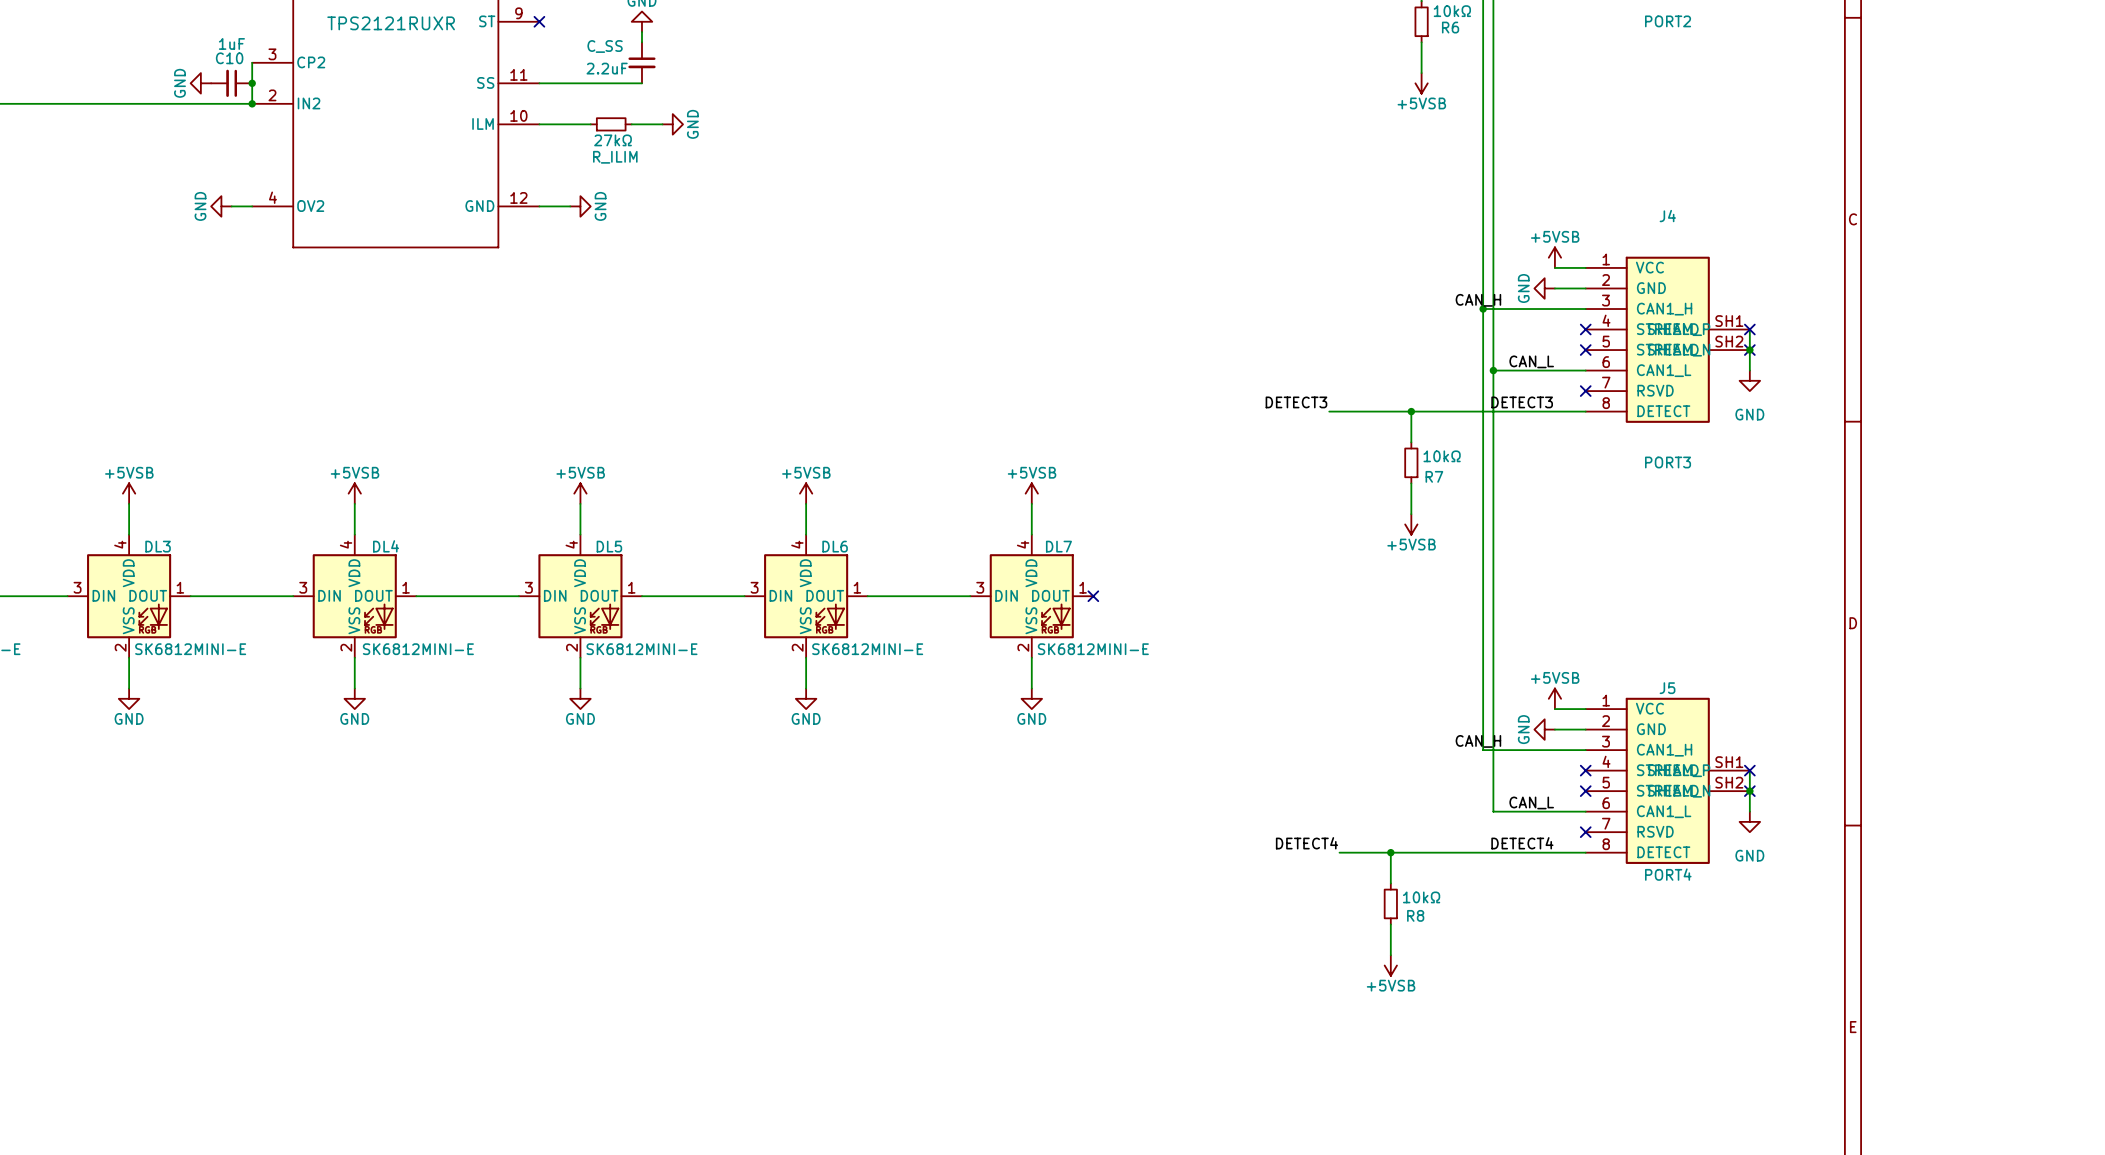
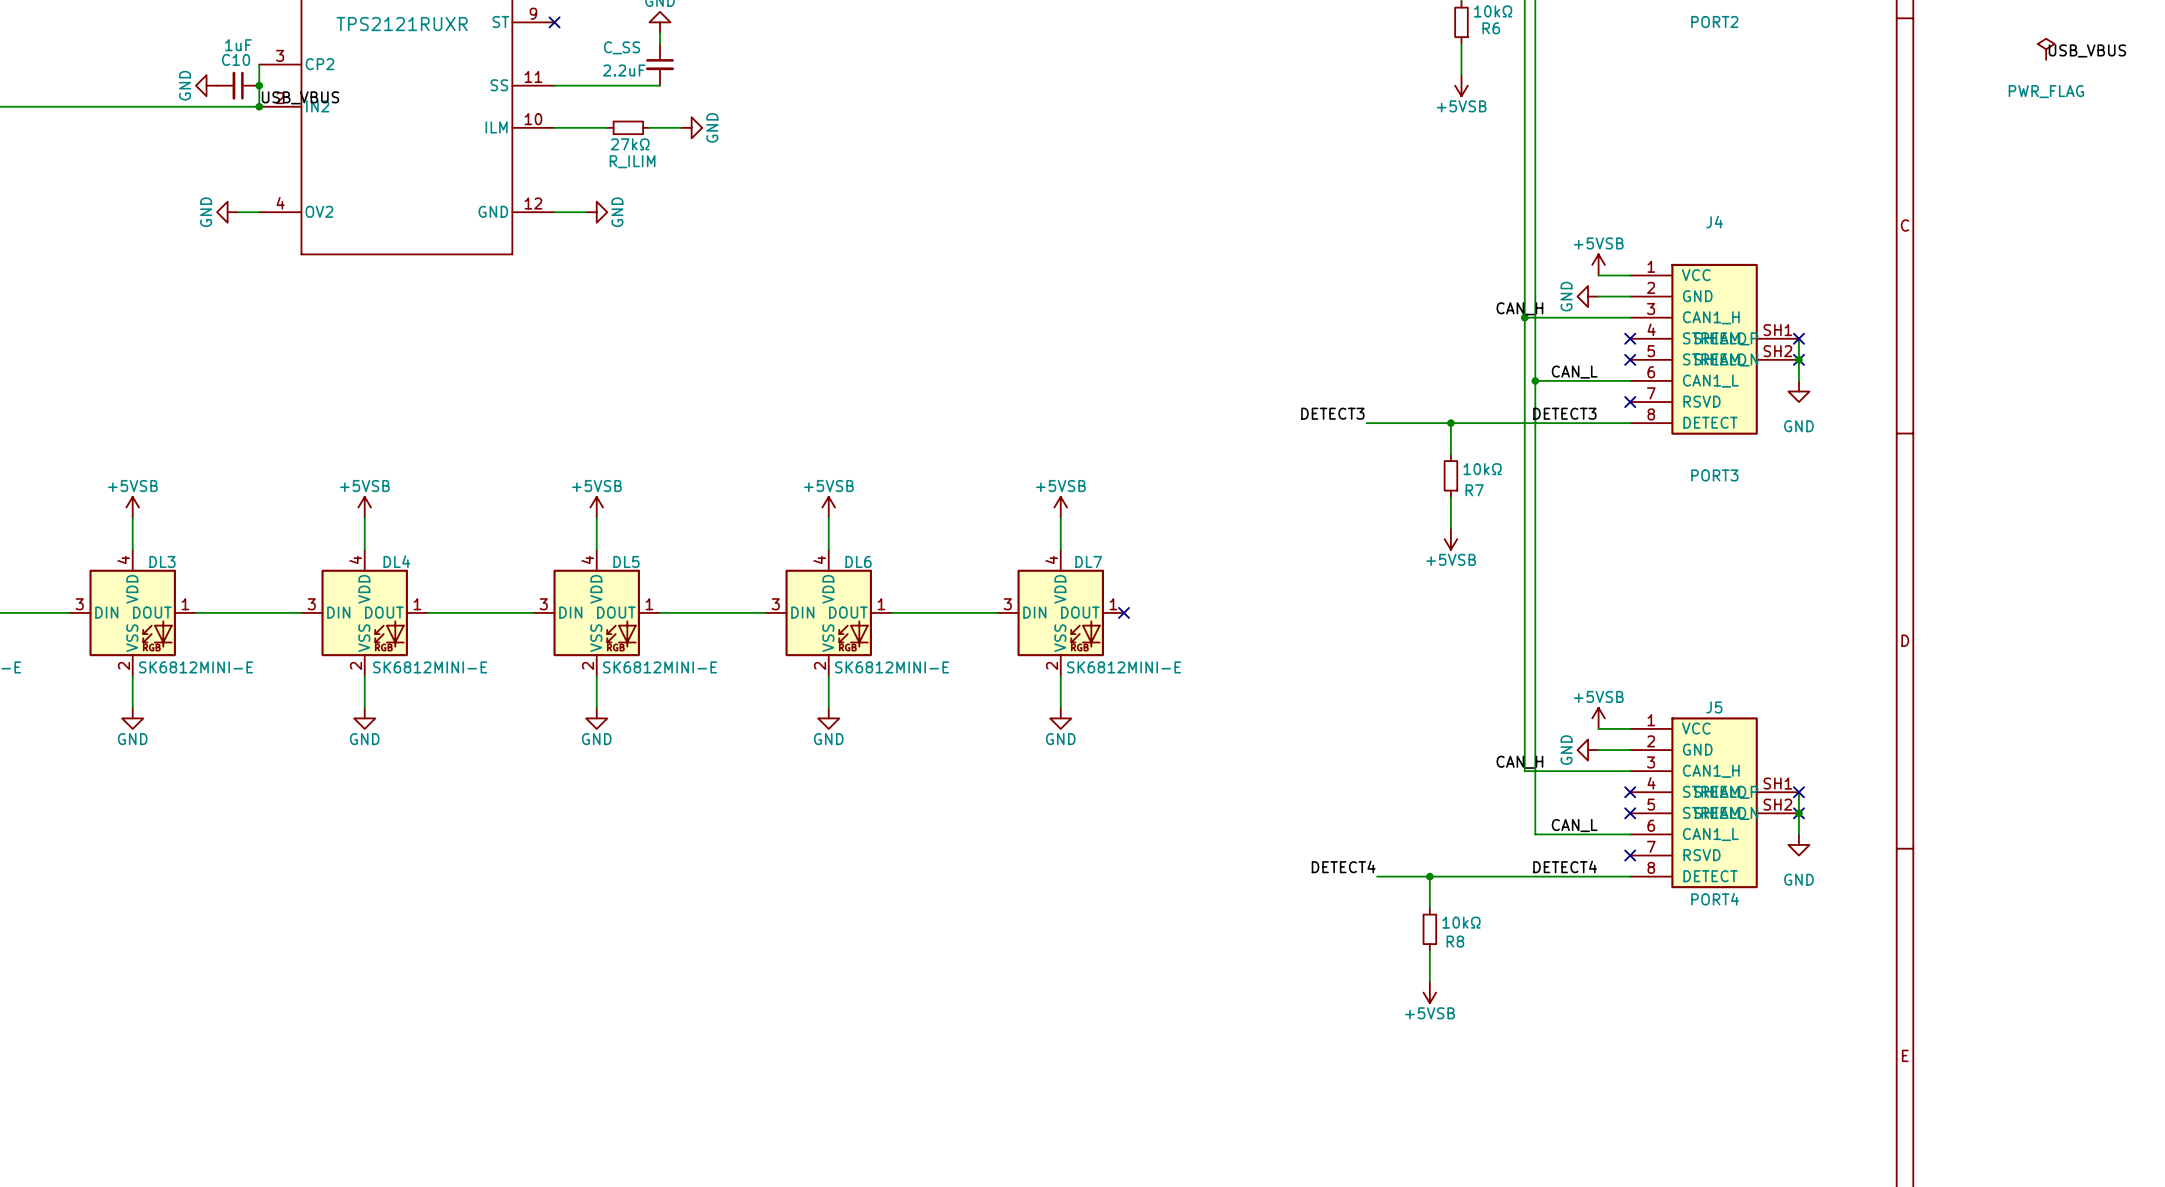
power symbol: none -> PWR_FLAG (2046, 49)
label: none -> USB_VBUS (2087, 50)
label: none -> USB_VBUS (300, 97)

